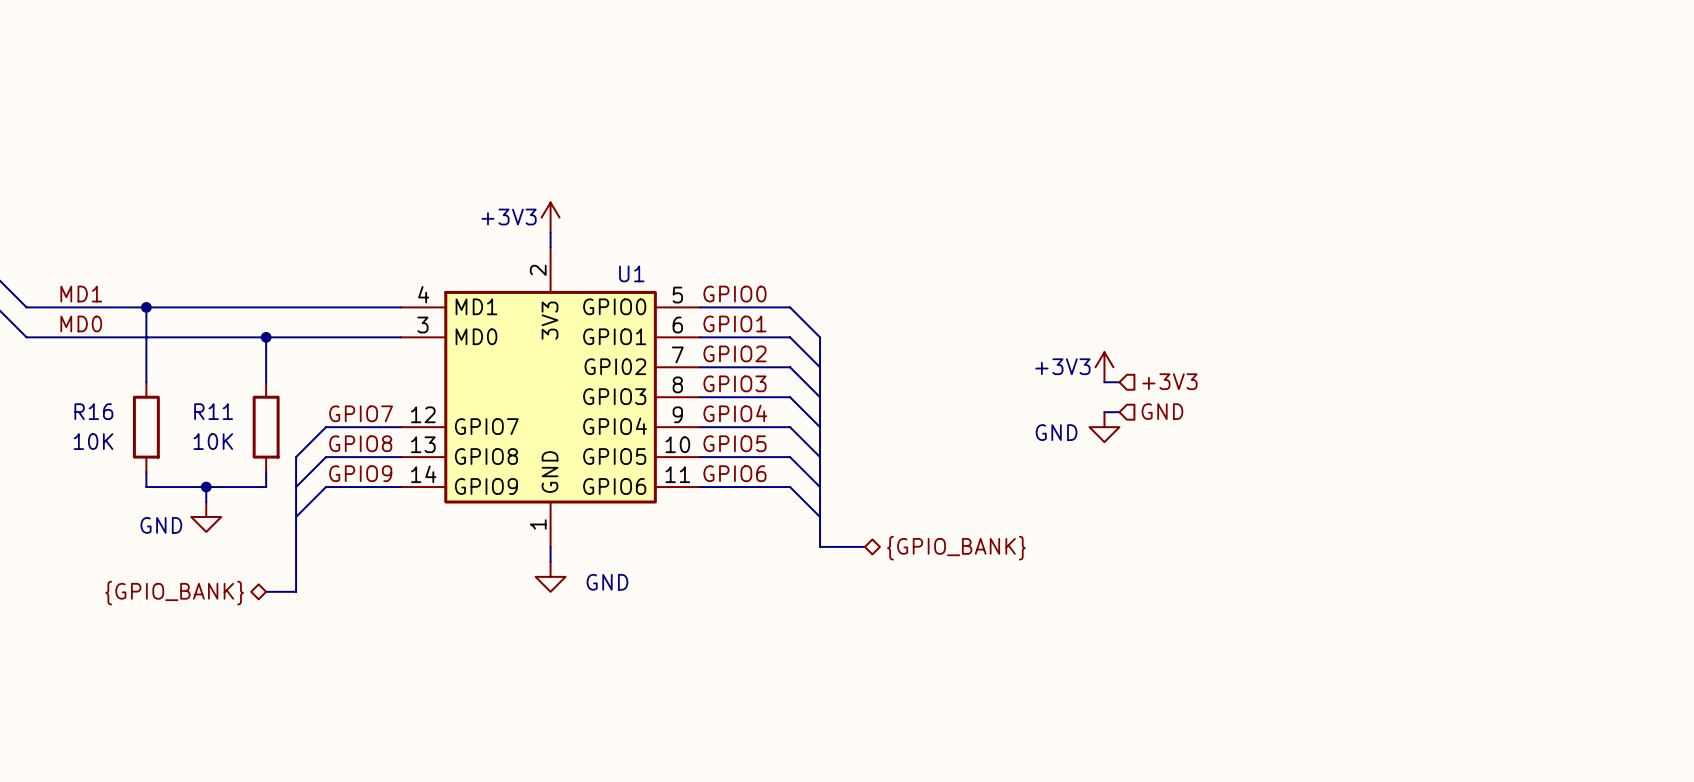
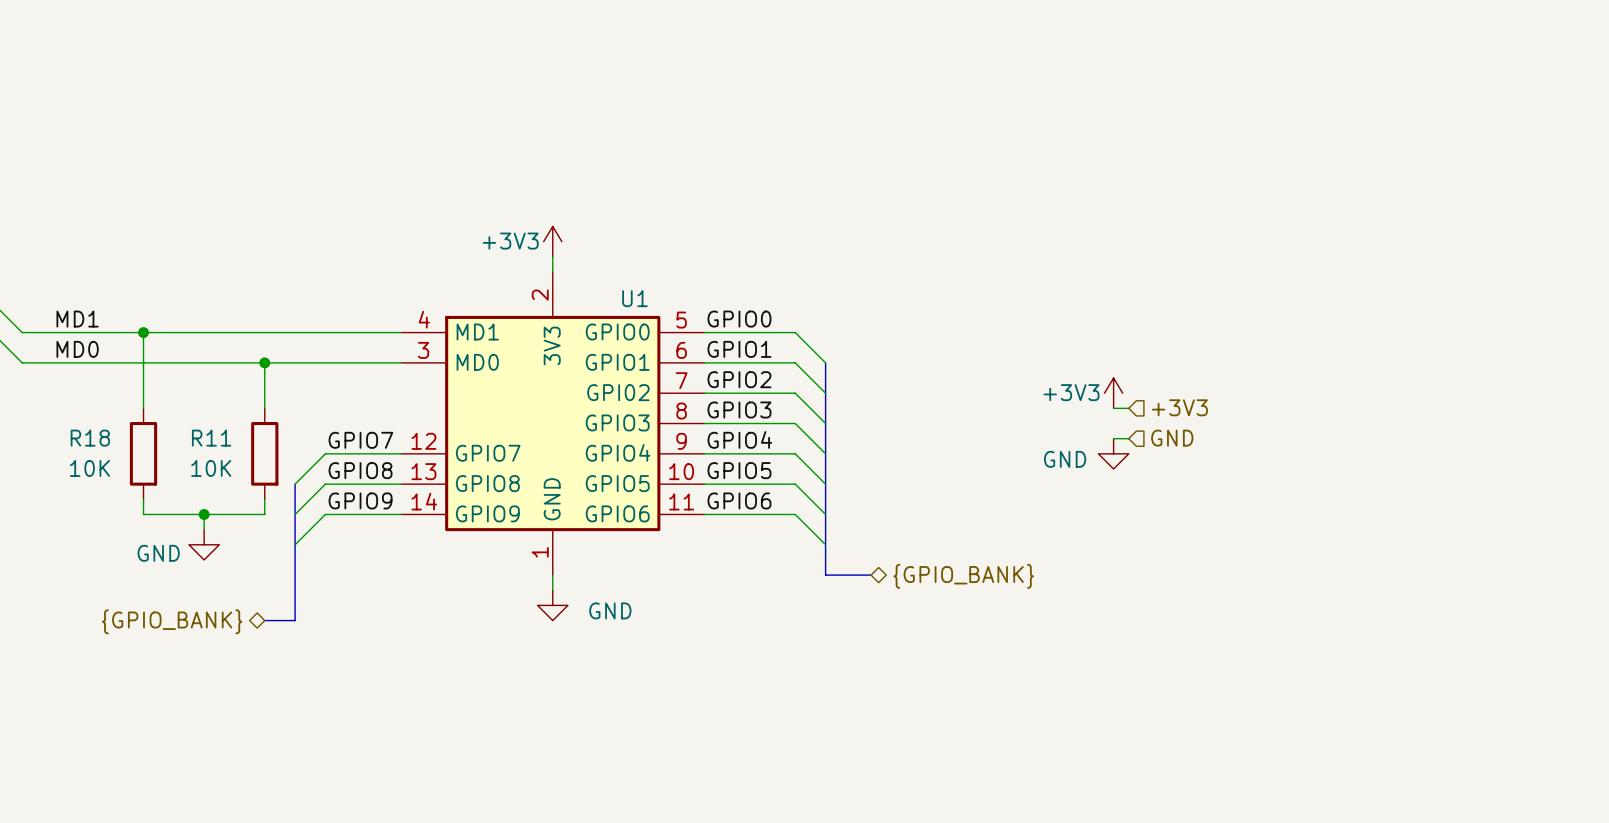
R16 name: R16 (93, 411) -> R18 (90, 438)

